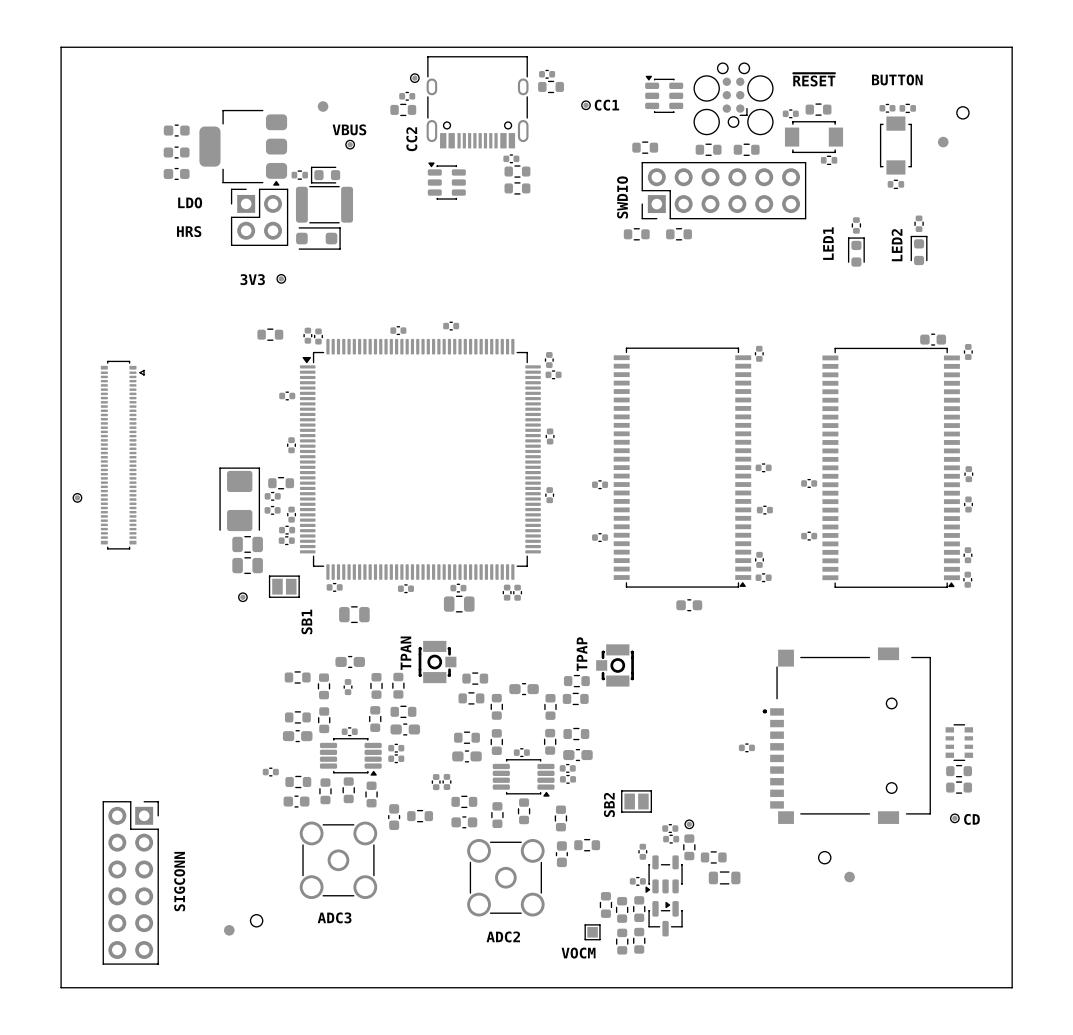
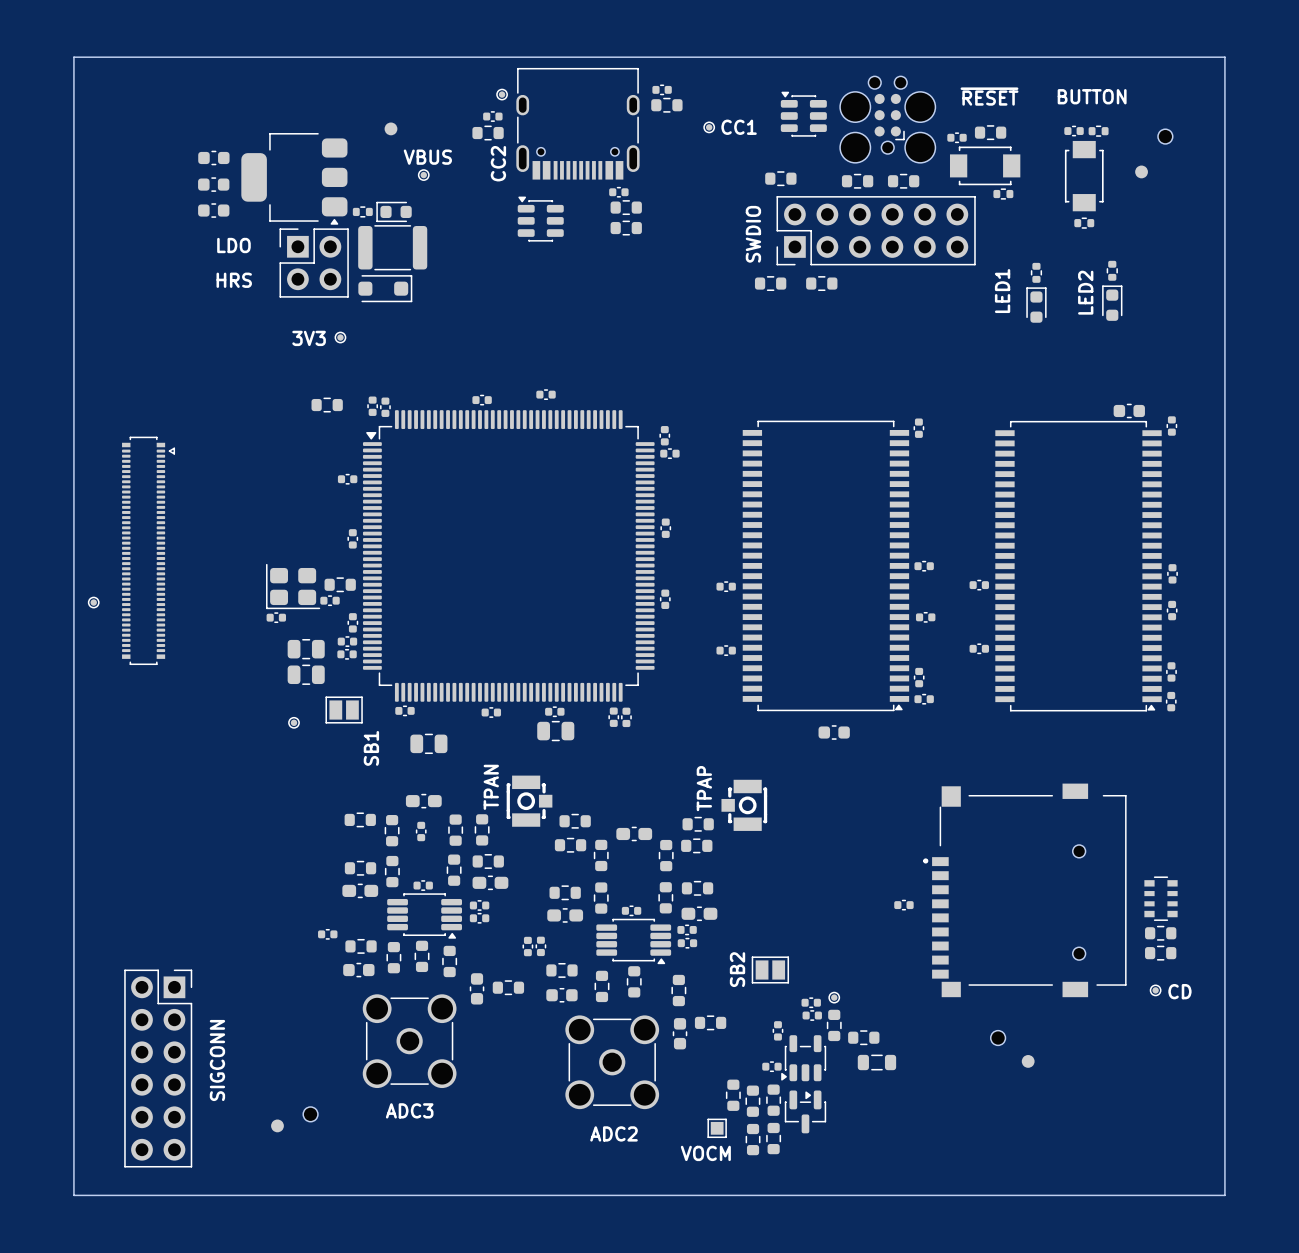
part: none -> (293, 586)
part: (239, 499) -> none
part position: (272, 510) -> (276, 617)
part: none -> (306, 649)
part: (247, 544) -> none
part: none -> (306, 674)
part: (247, 565) -> none

